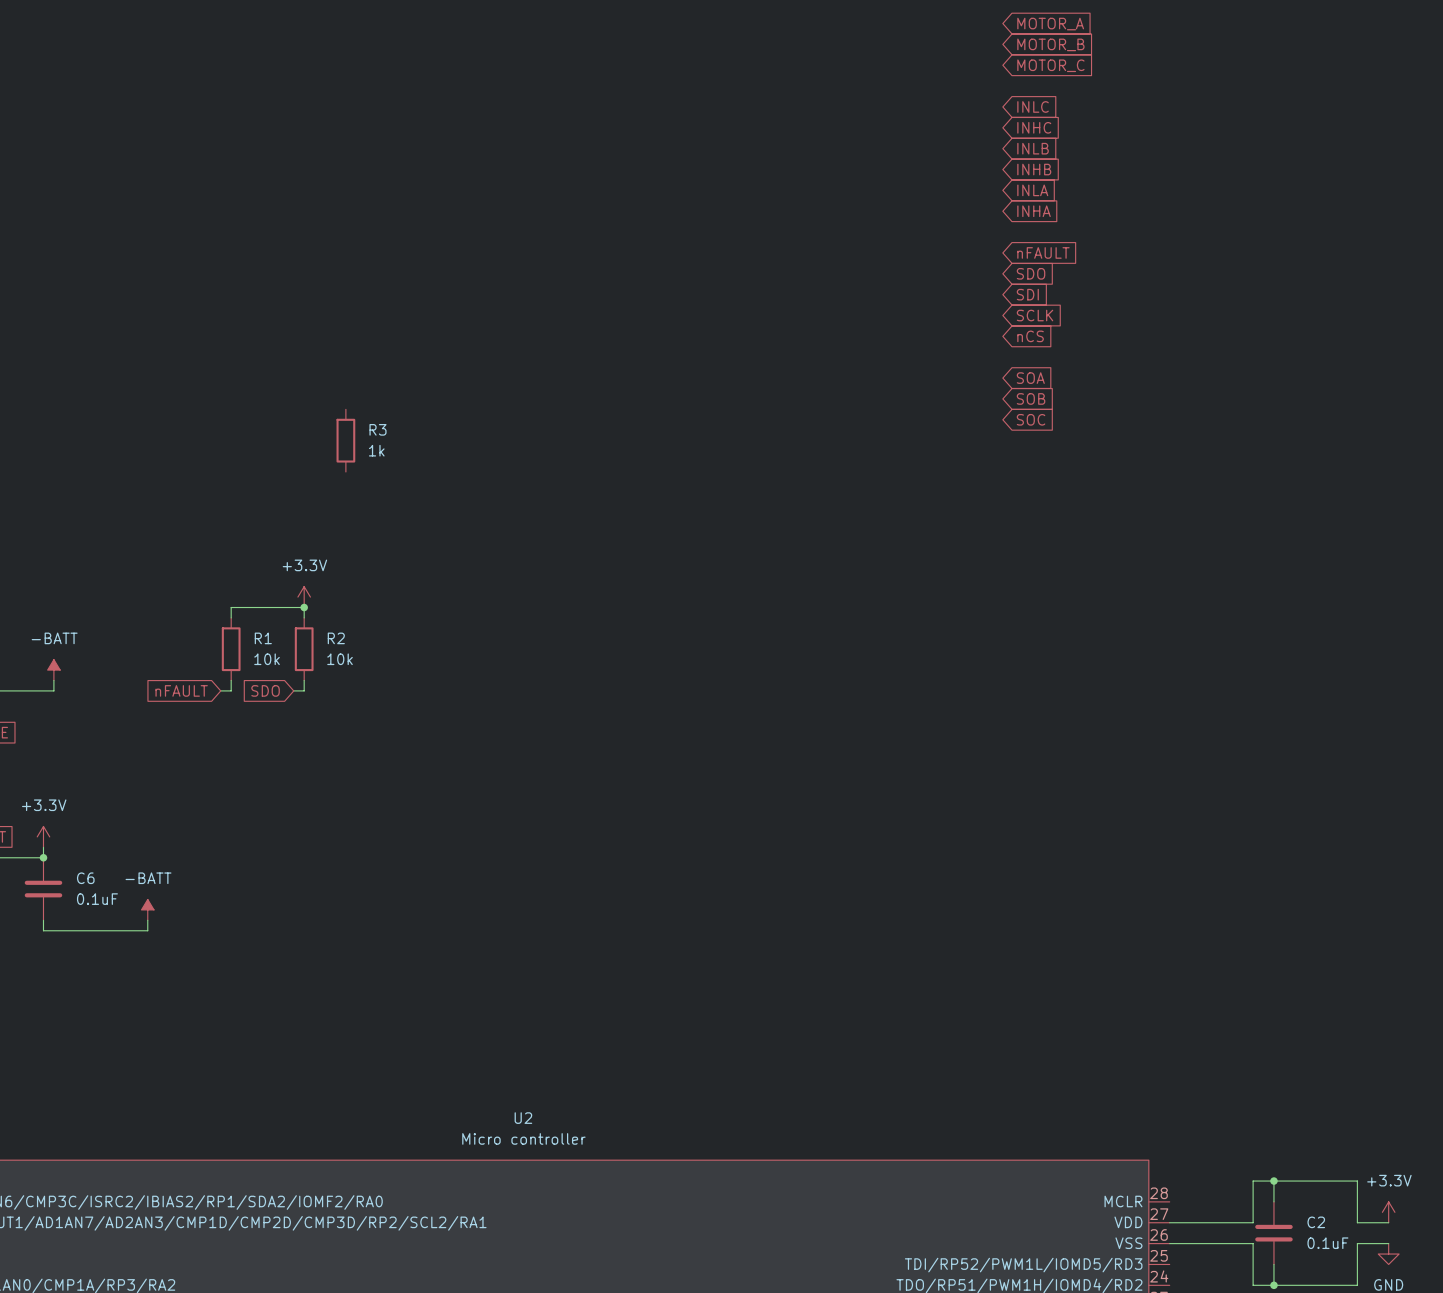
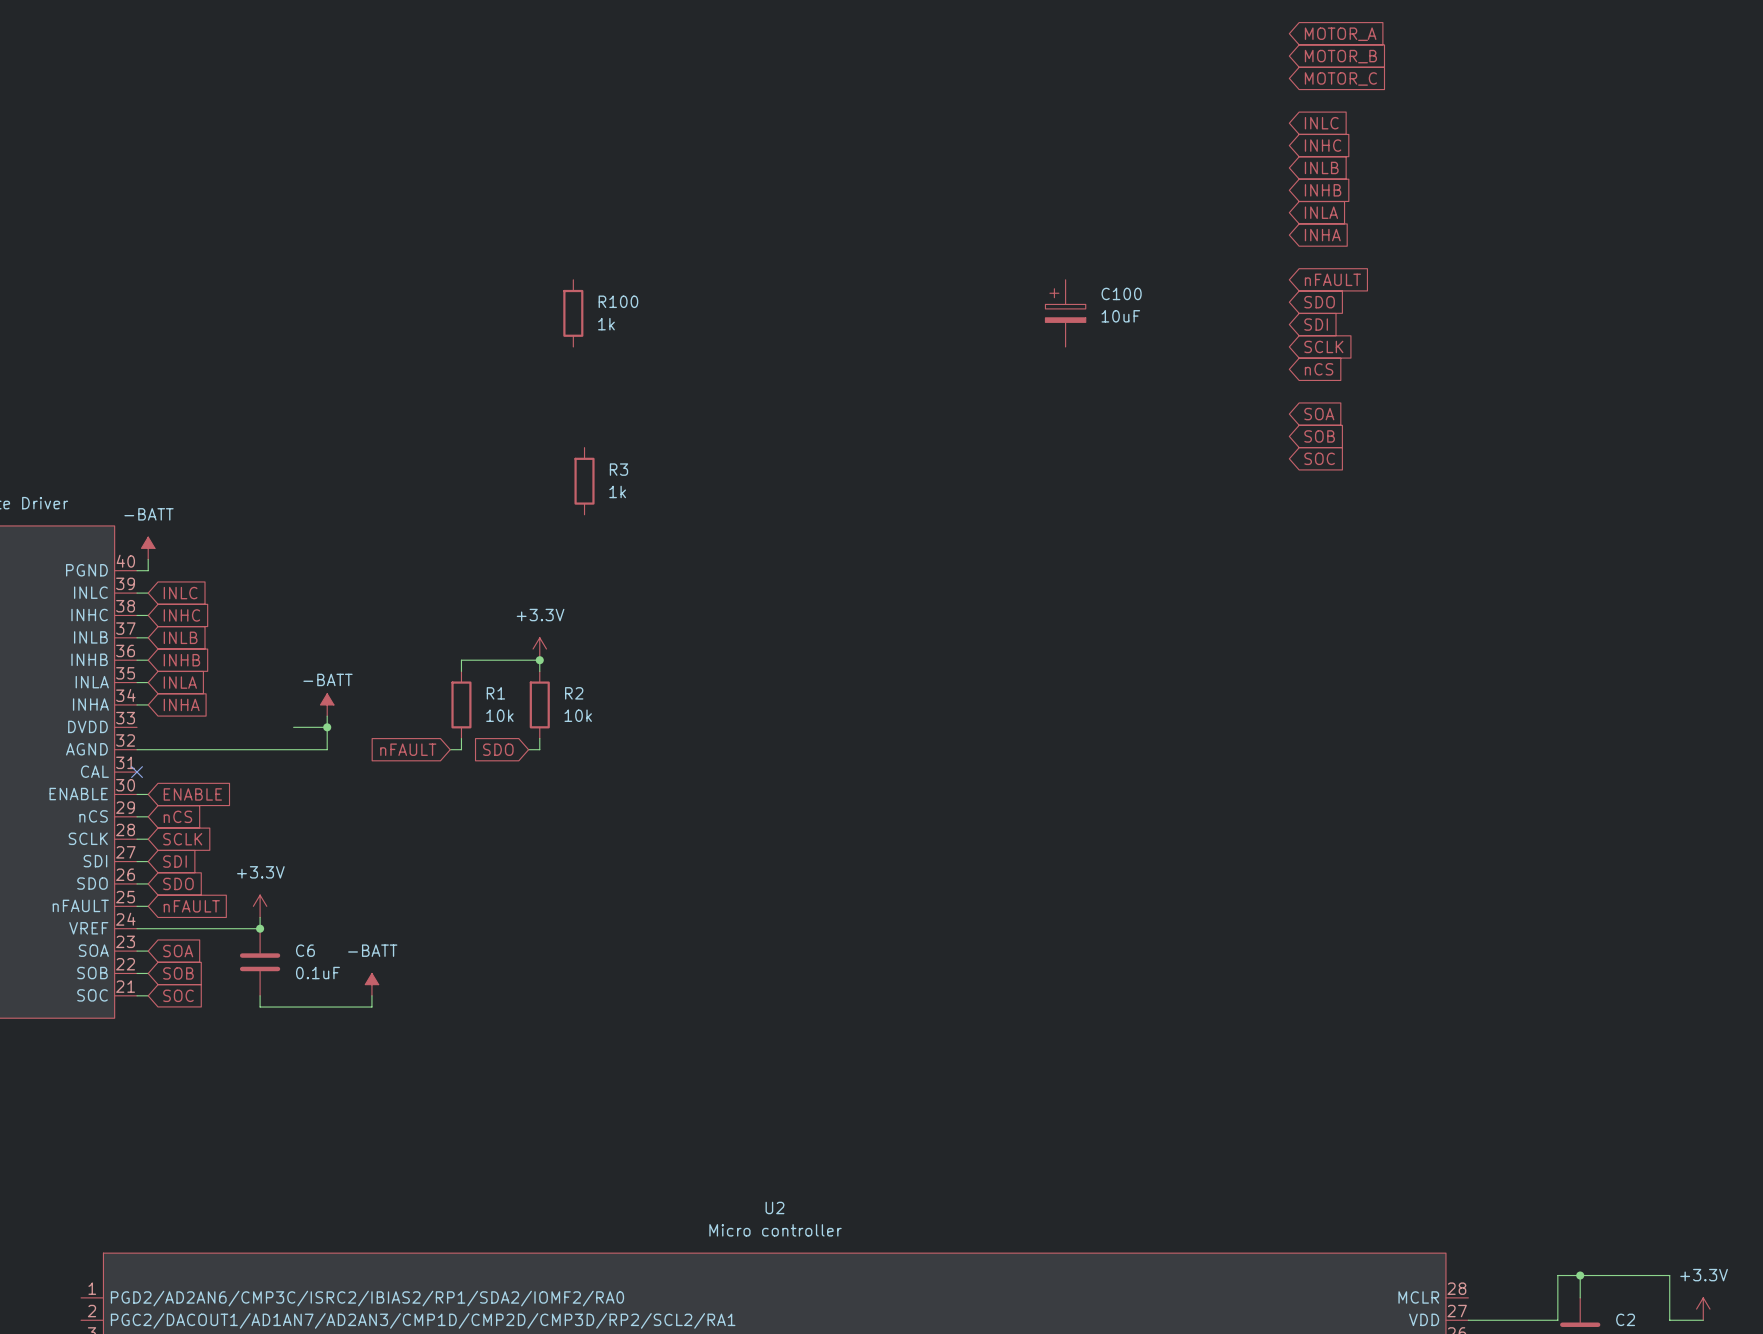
R100: none -> 1k (573, 313)
C100: none -> 10uF (1065, 313)
power symbol text position: -BATT (54, 638) -> -BATT (328, 679)
power symbol position: -BATT (53, 670) -> -BATT (327, 704)
wire: none -> (293, 727) (327, 727)
junction: none -> (327, 727)
wire: (53, 680) (53, 690) -> (327, 716) (327, 749) (271, 749)

